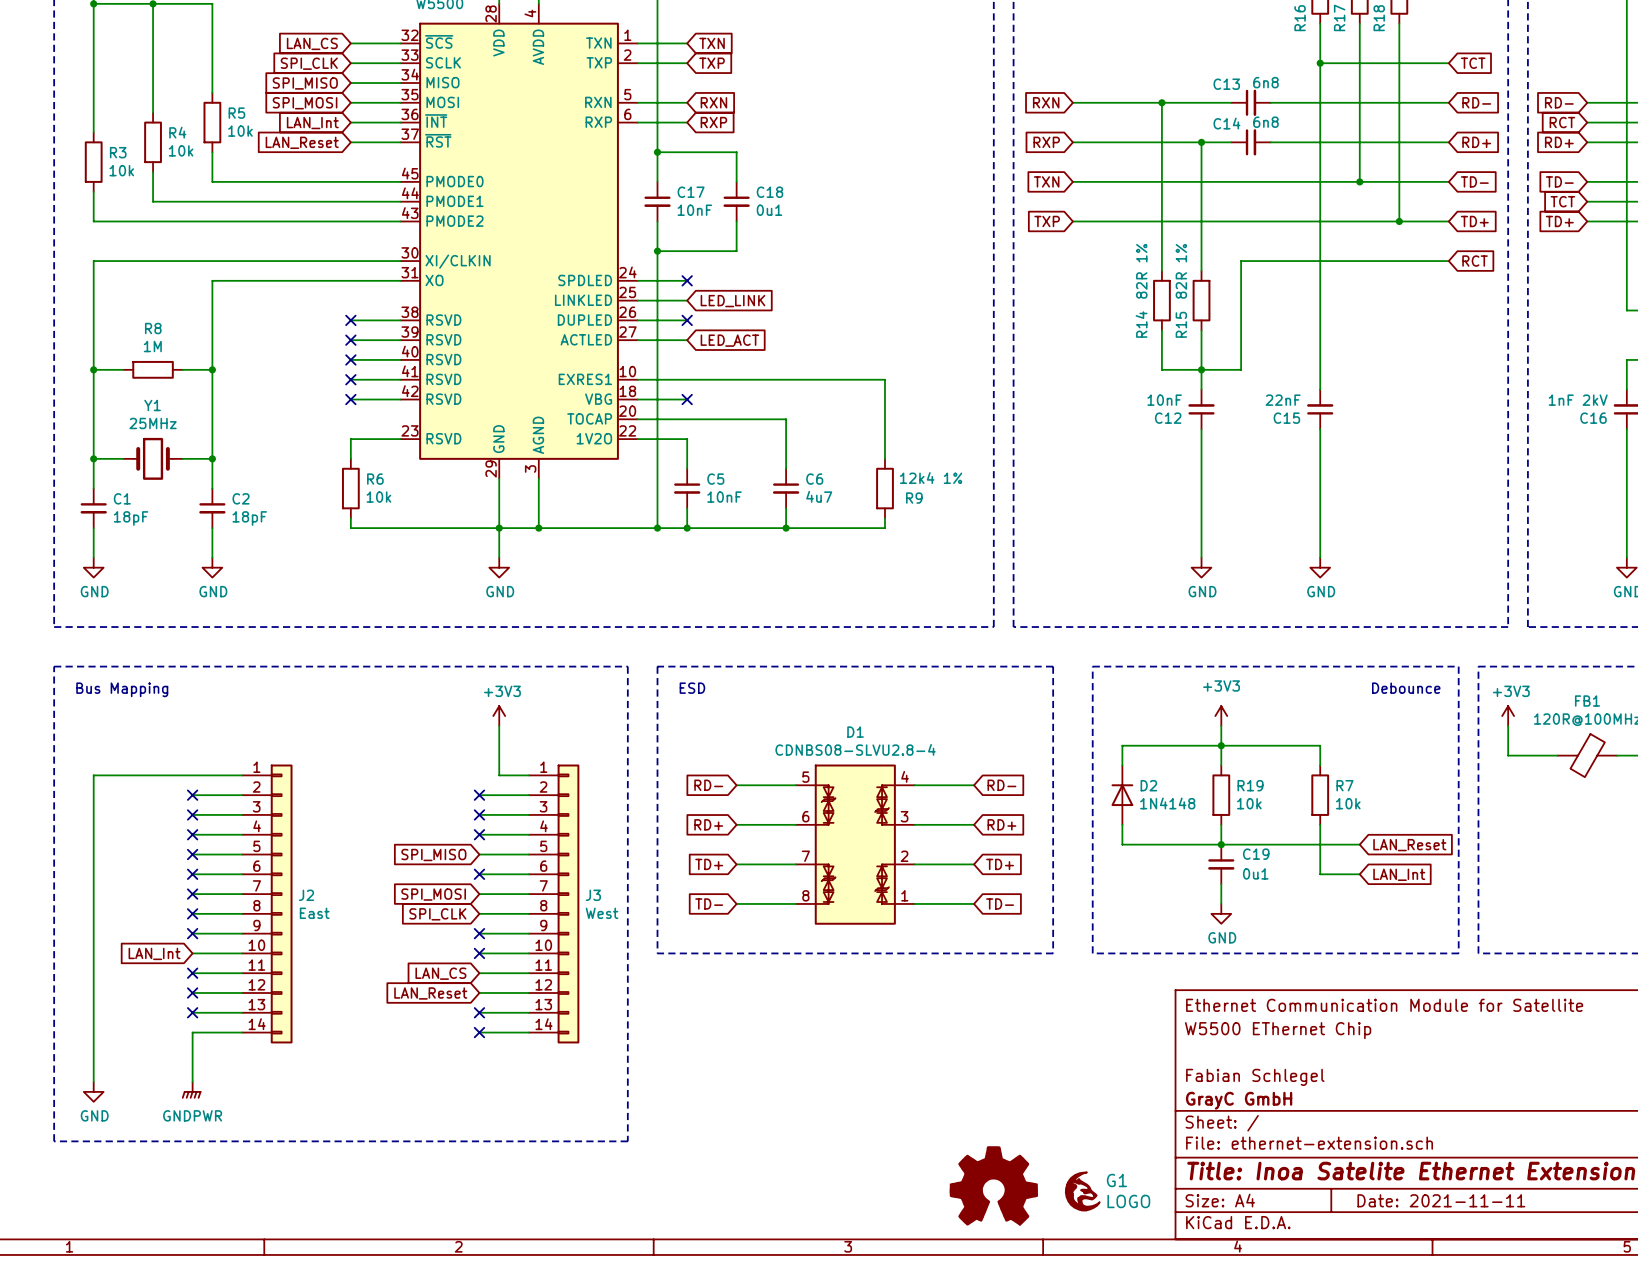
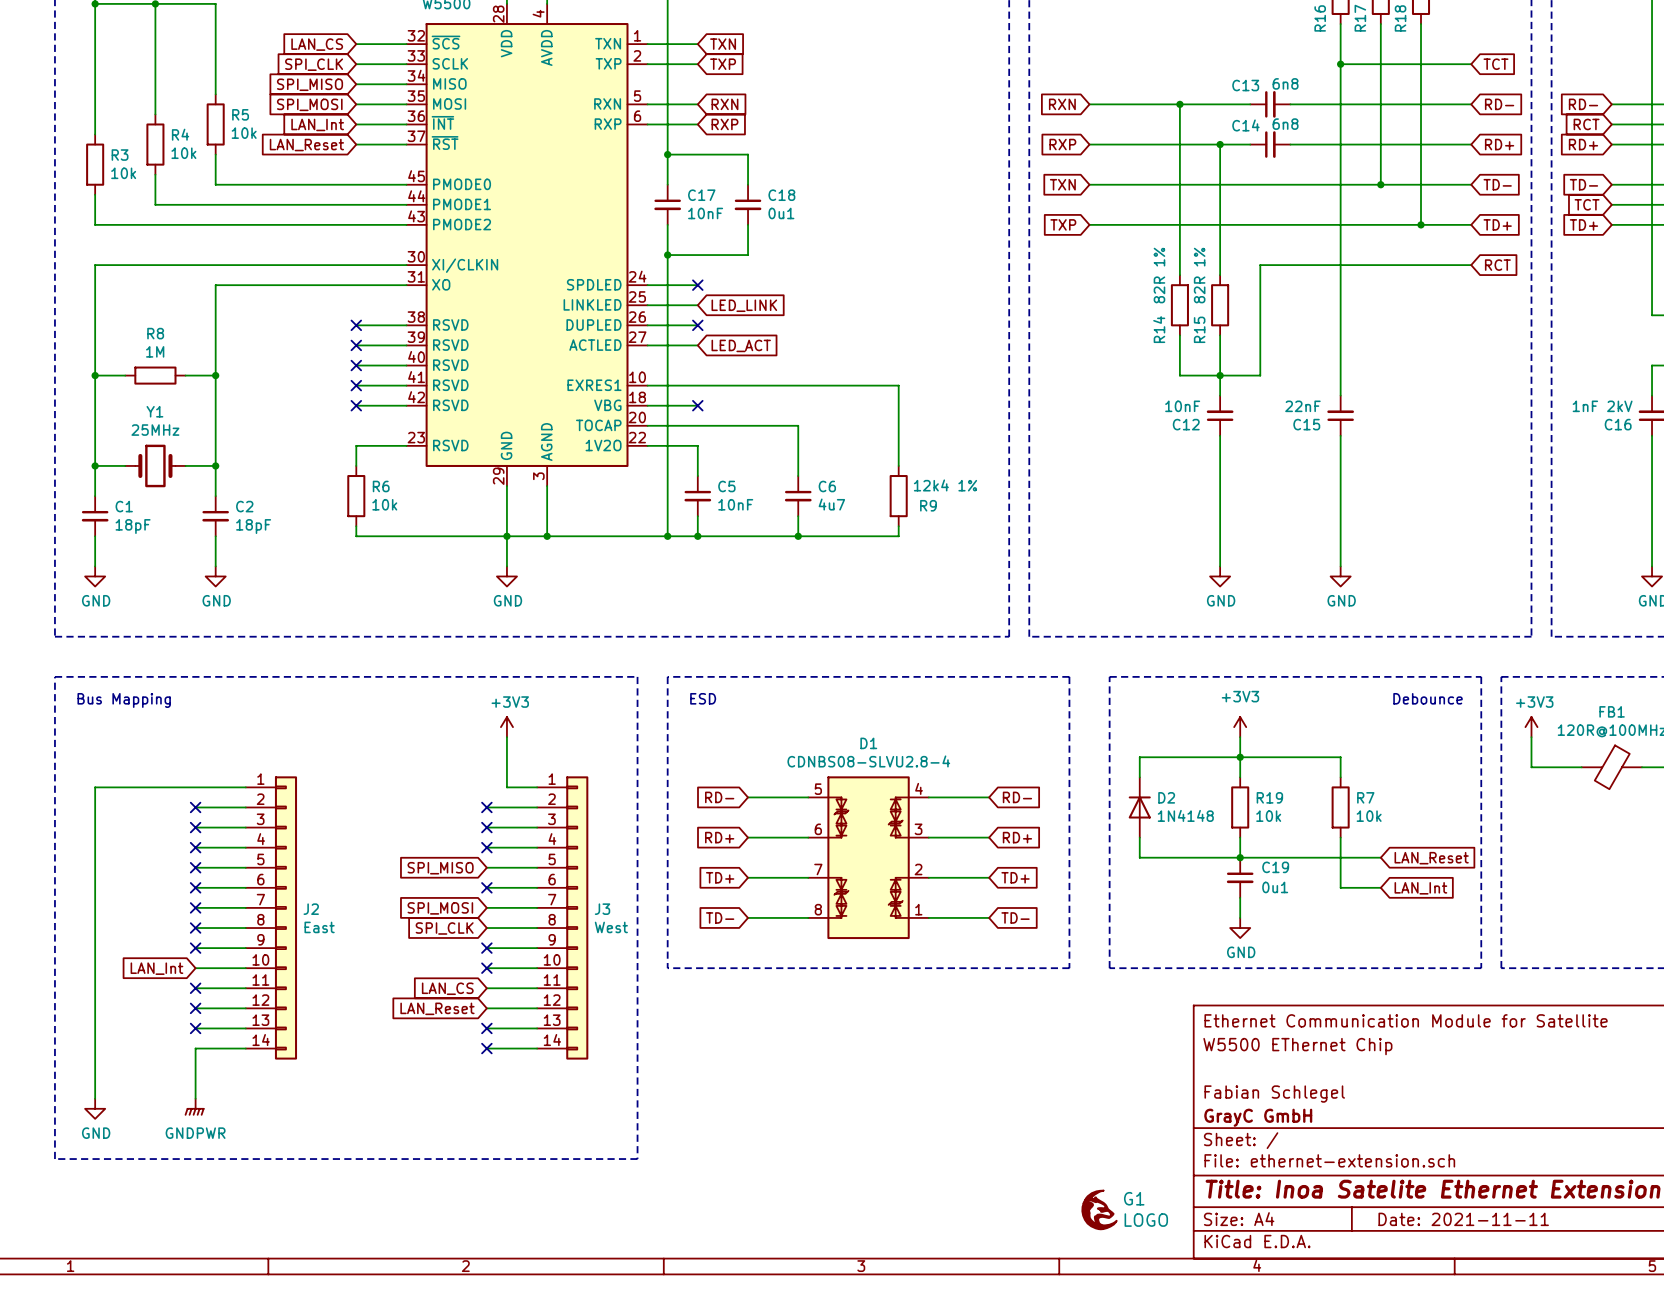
part: (993, 1185) -> none

